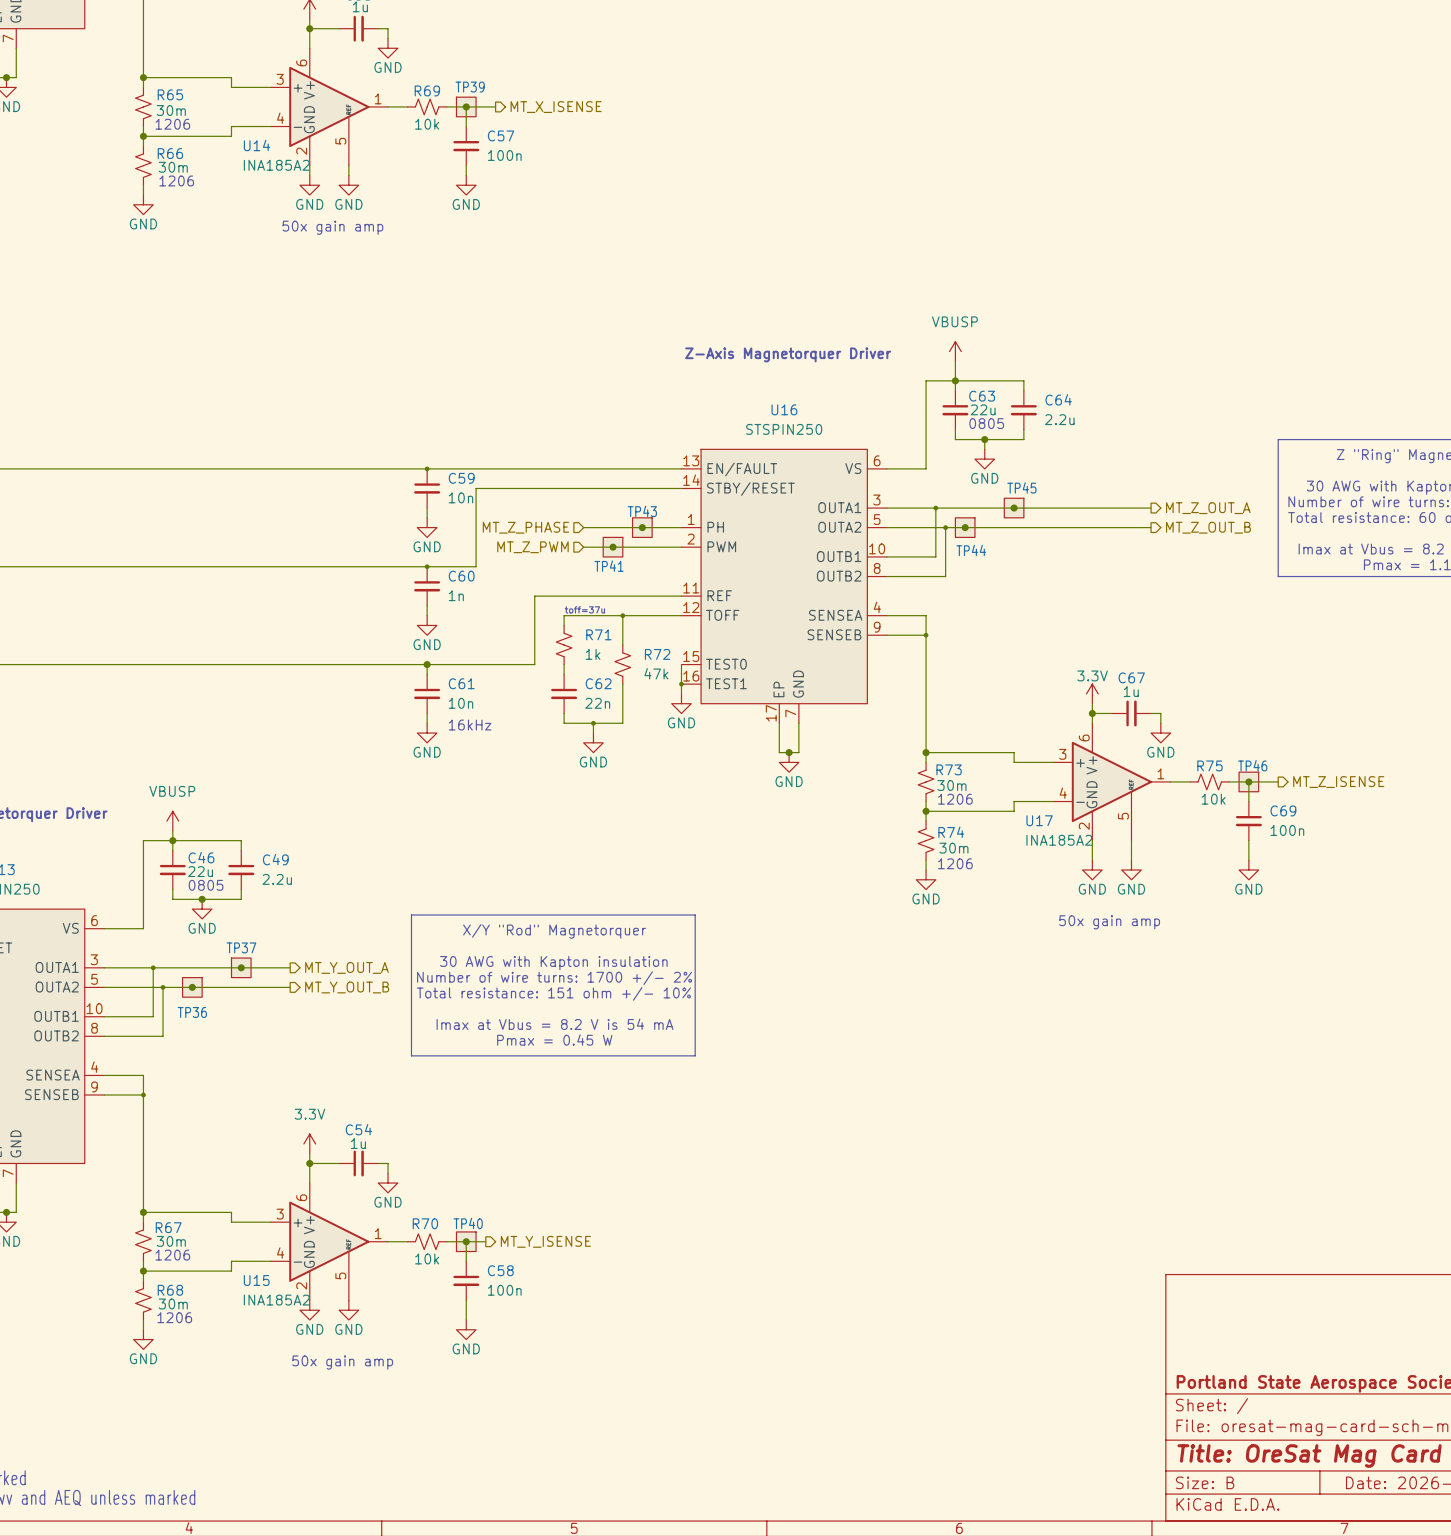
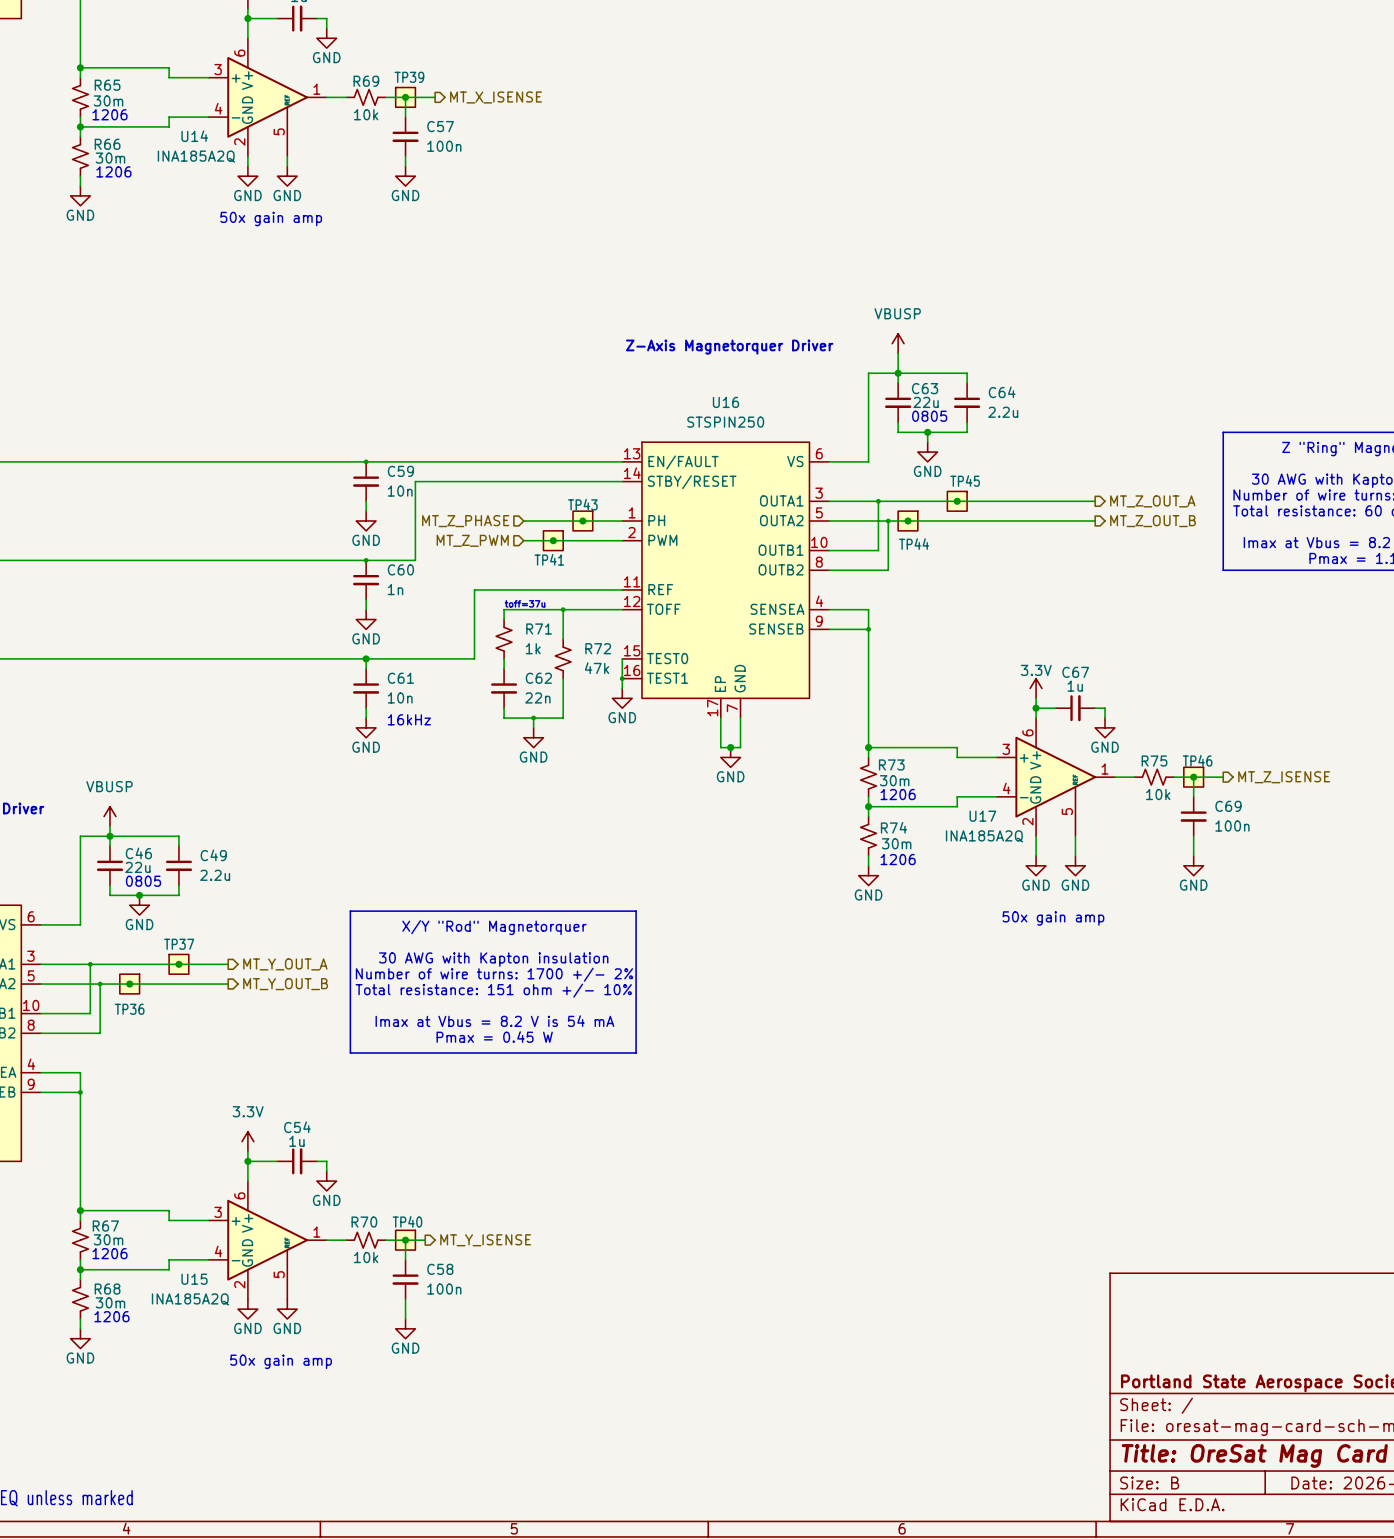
U14 value: INA185A2 (276, 165) -> INA185A2Q (196, 156)
U17 value: INA185A2 (1059, 840) -> INA185A2Q (984, 836)
U15 value: INA185A2 (276, 1300) -> INA185A2Q (190, 1299)

